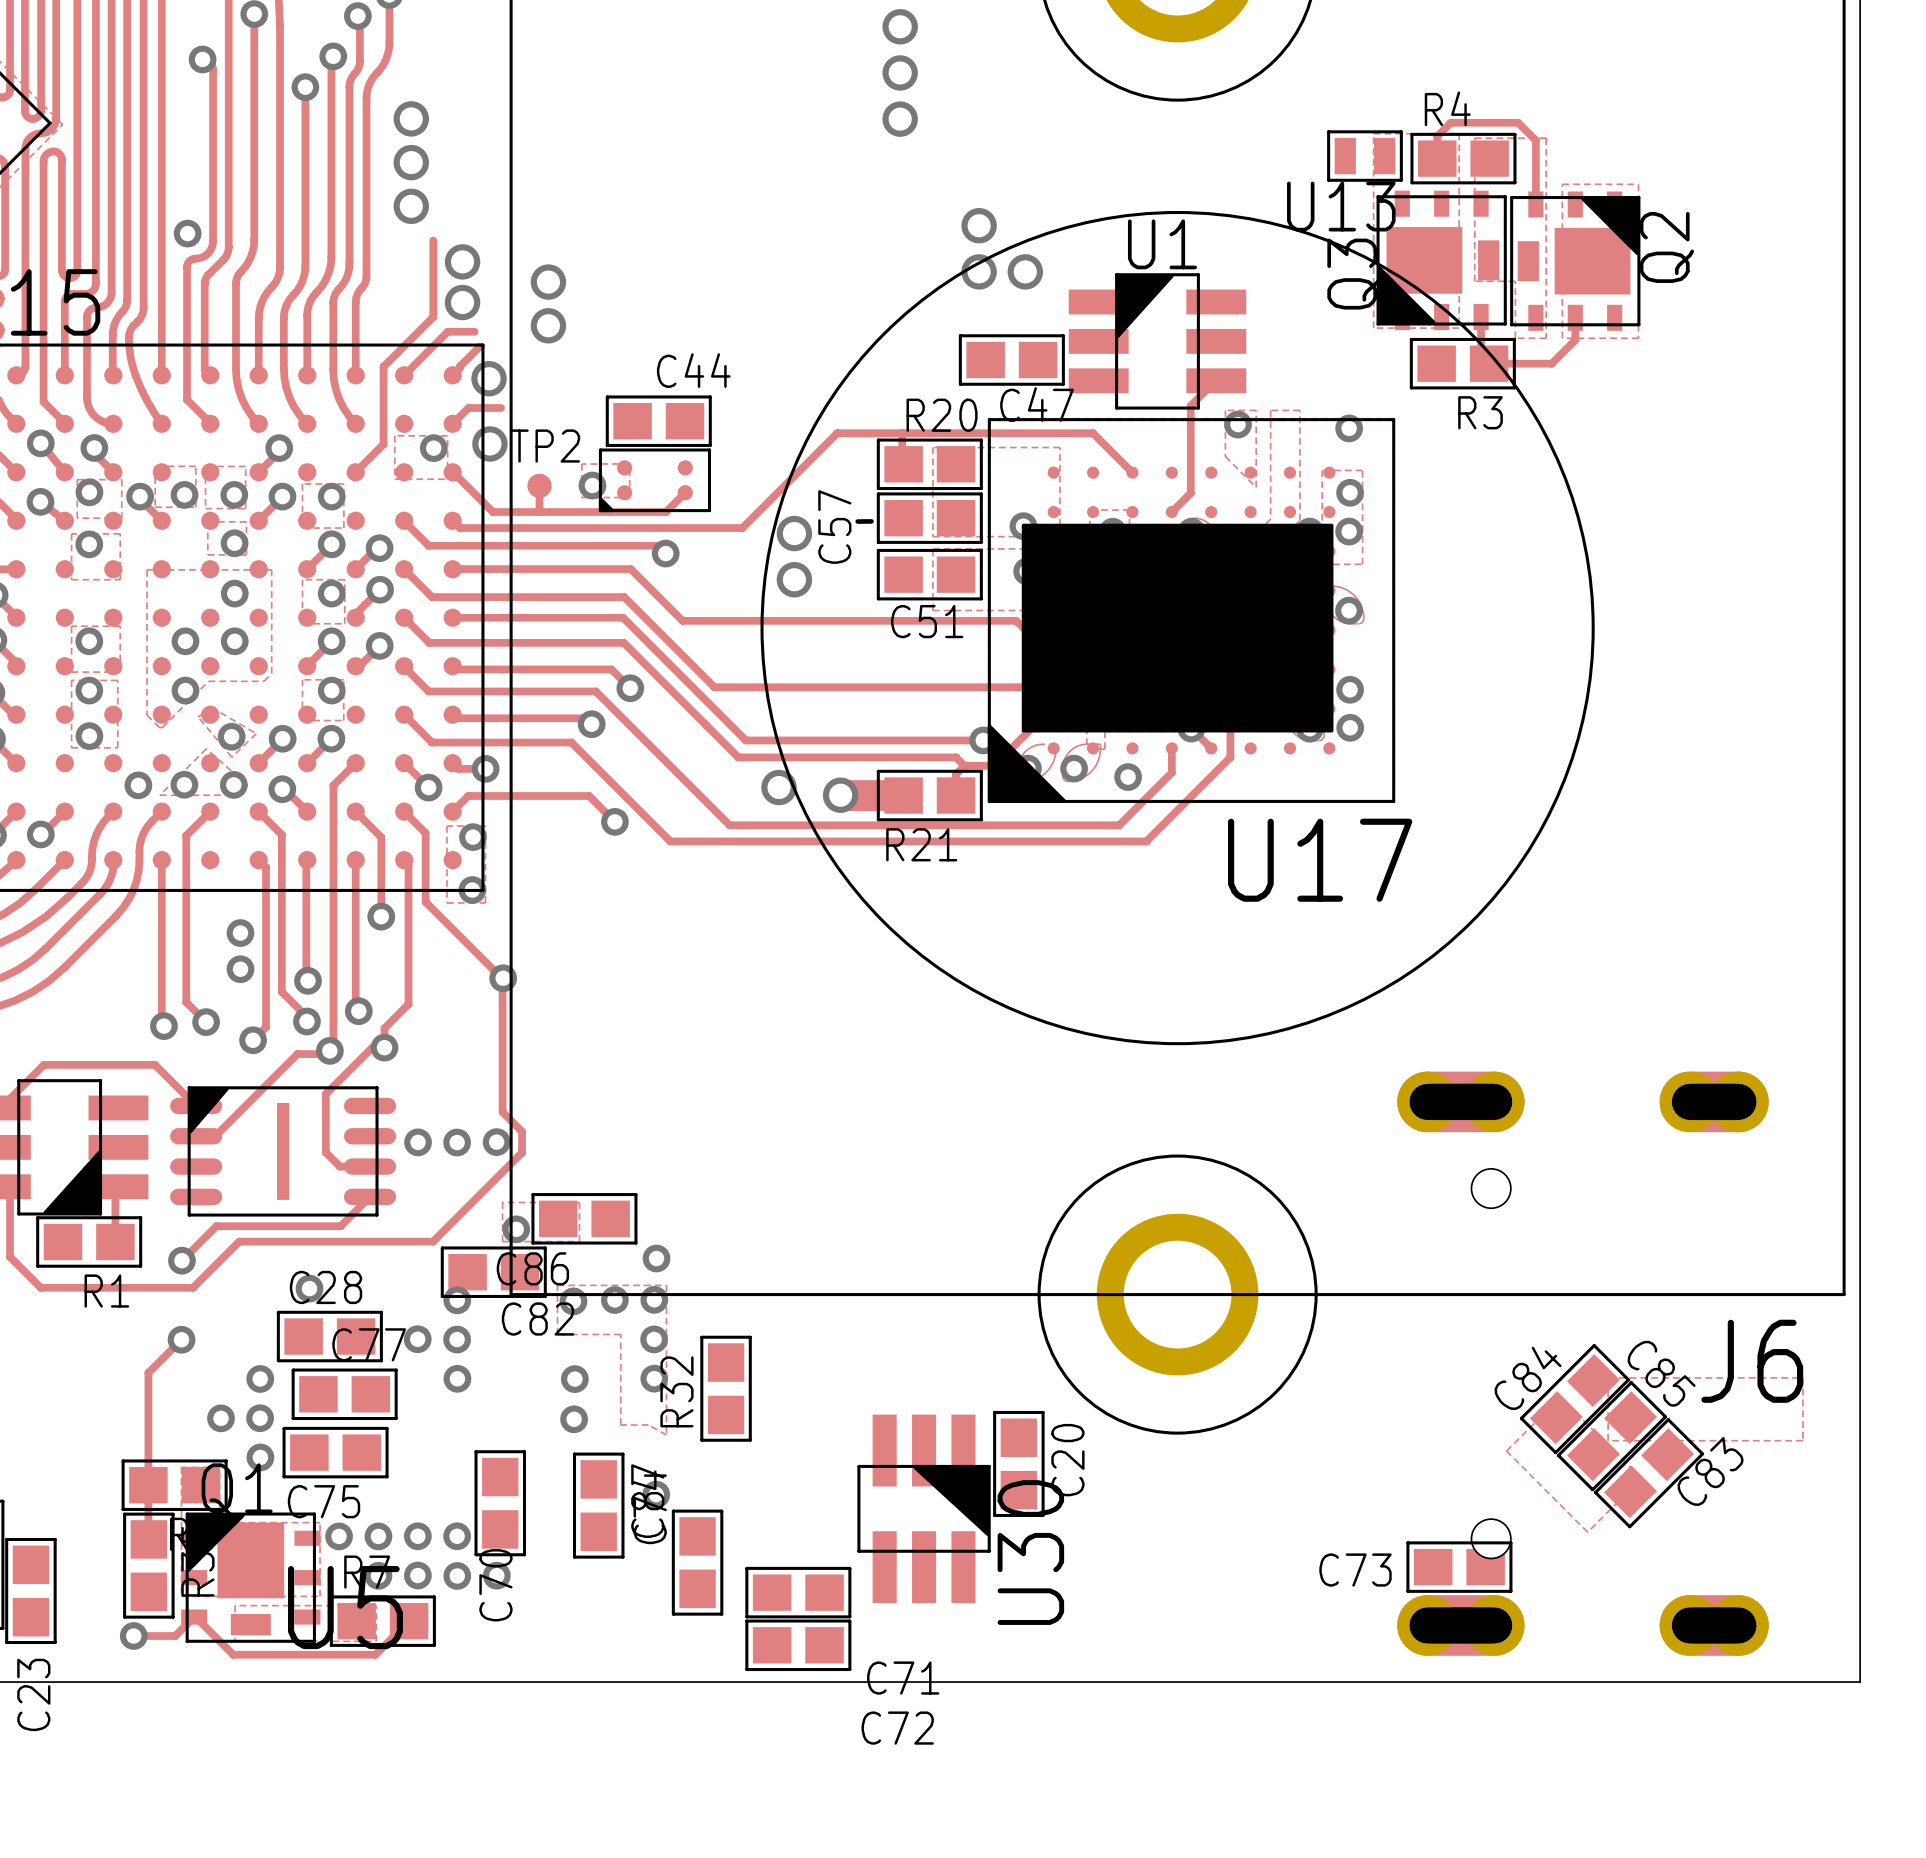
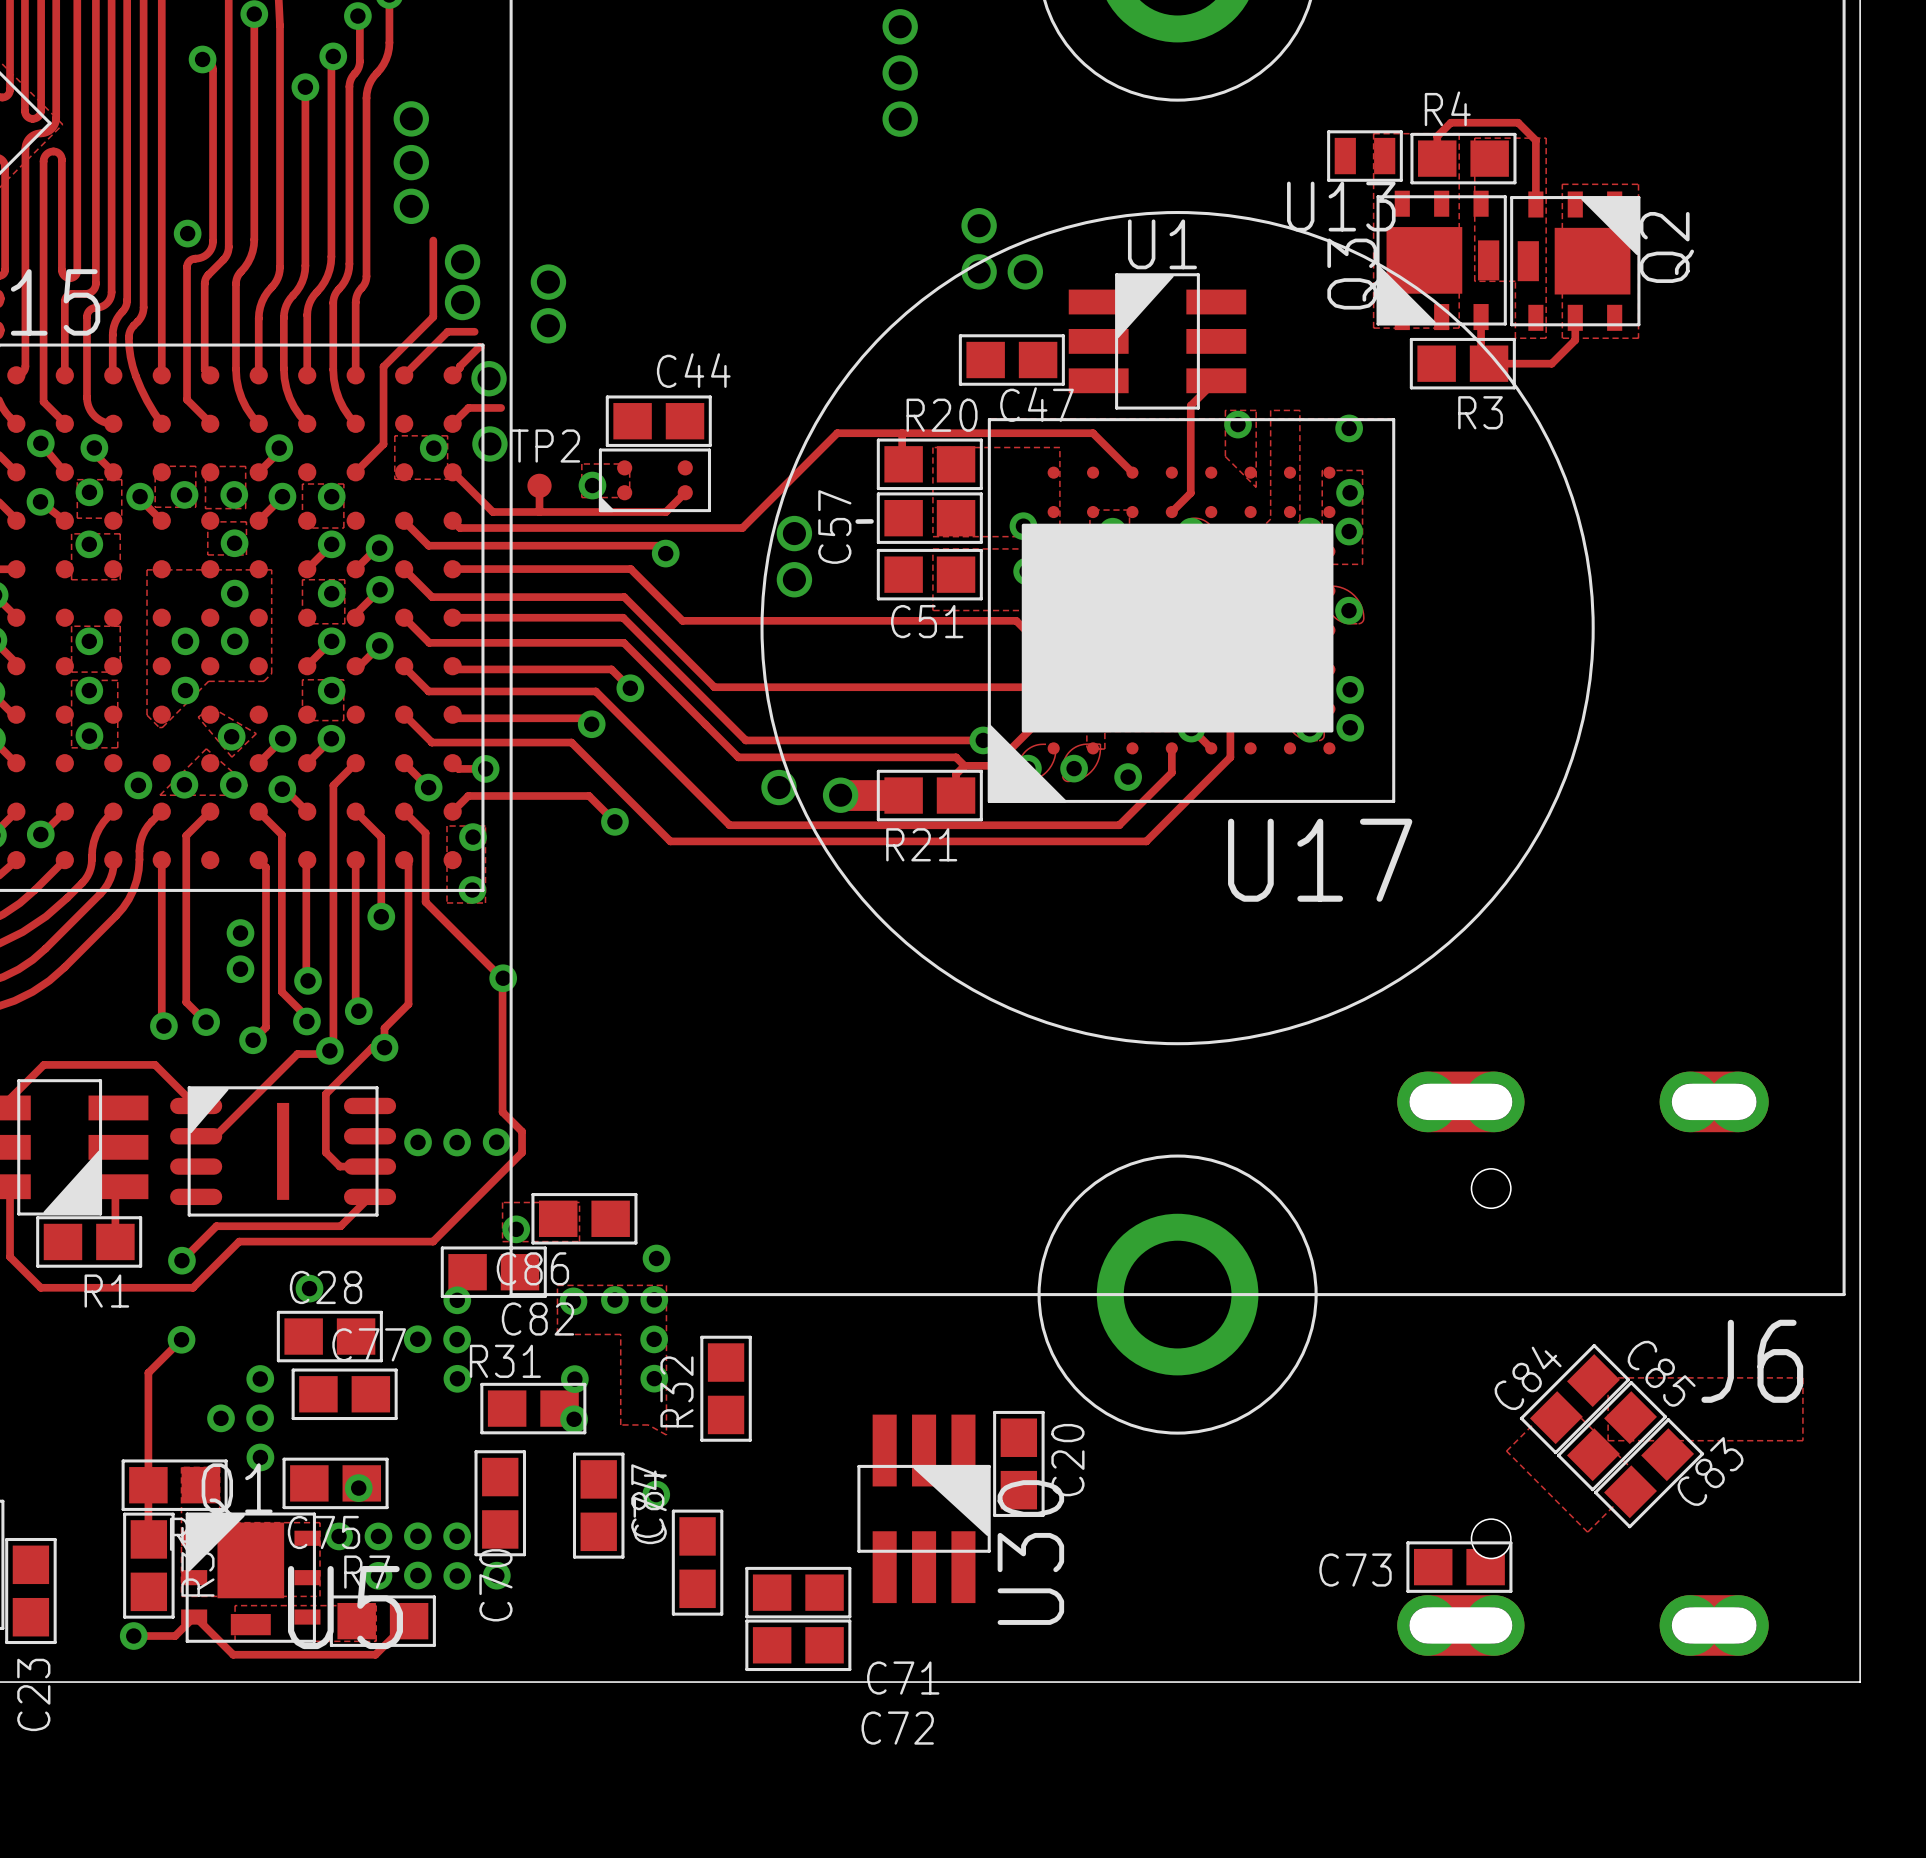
R31: none -> (533, 1408)
C75 position: (335, 1452) -> (335, 1483)
via: none -> (358, 1488)

